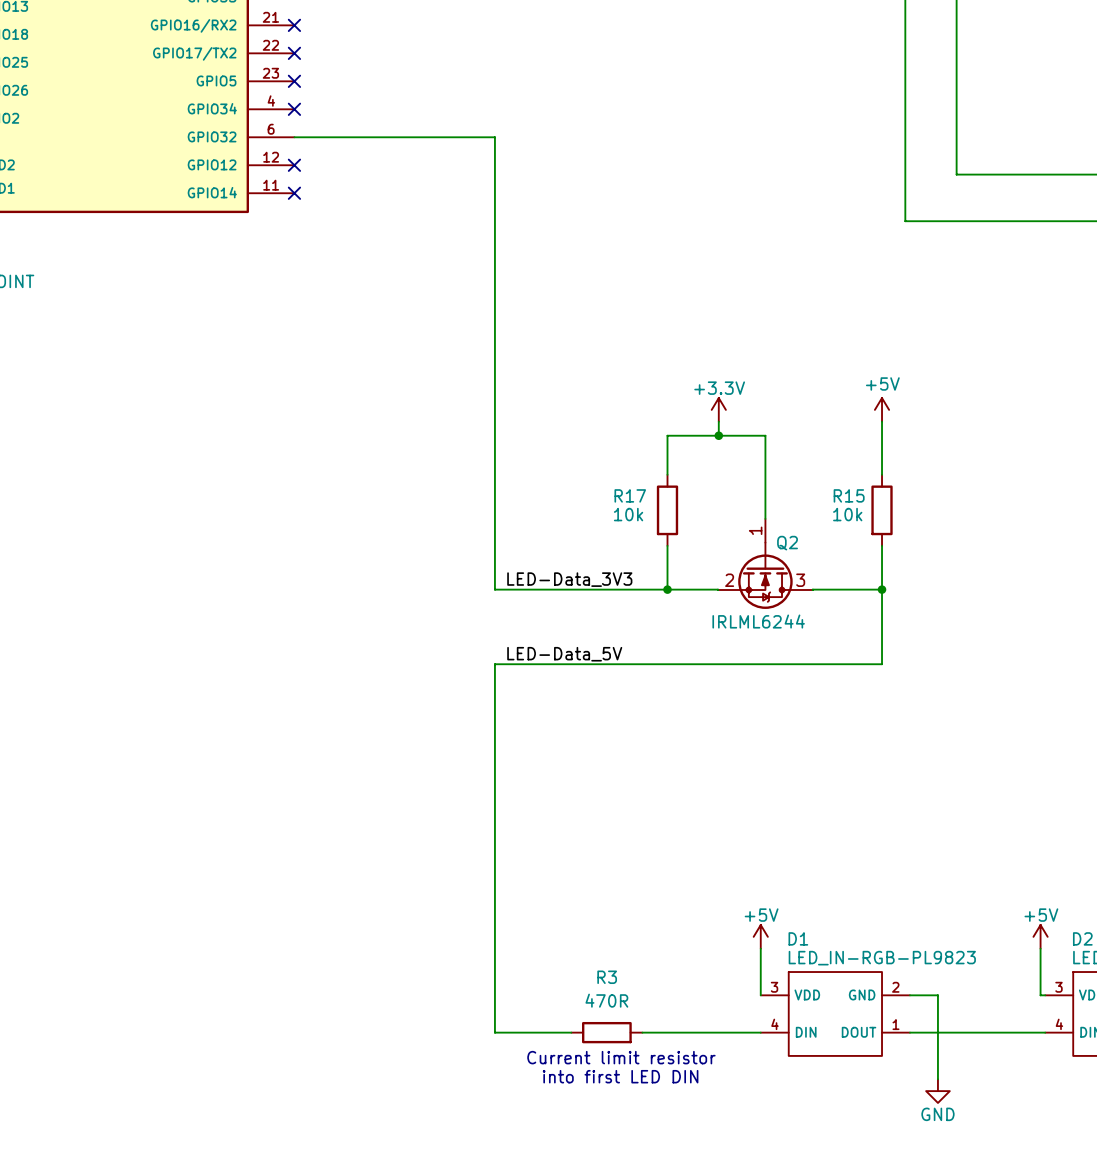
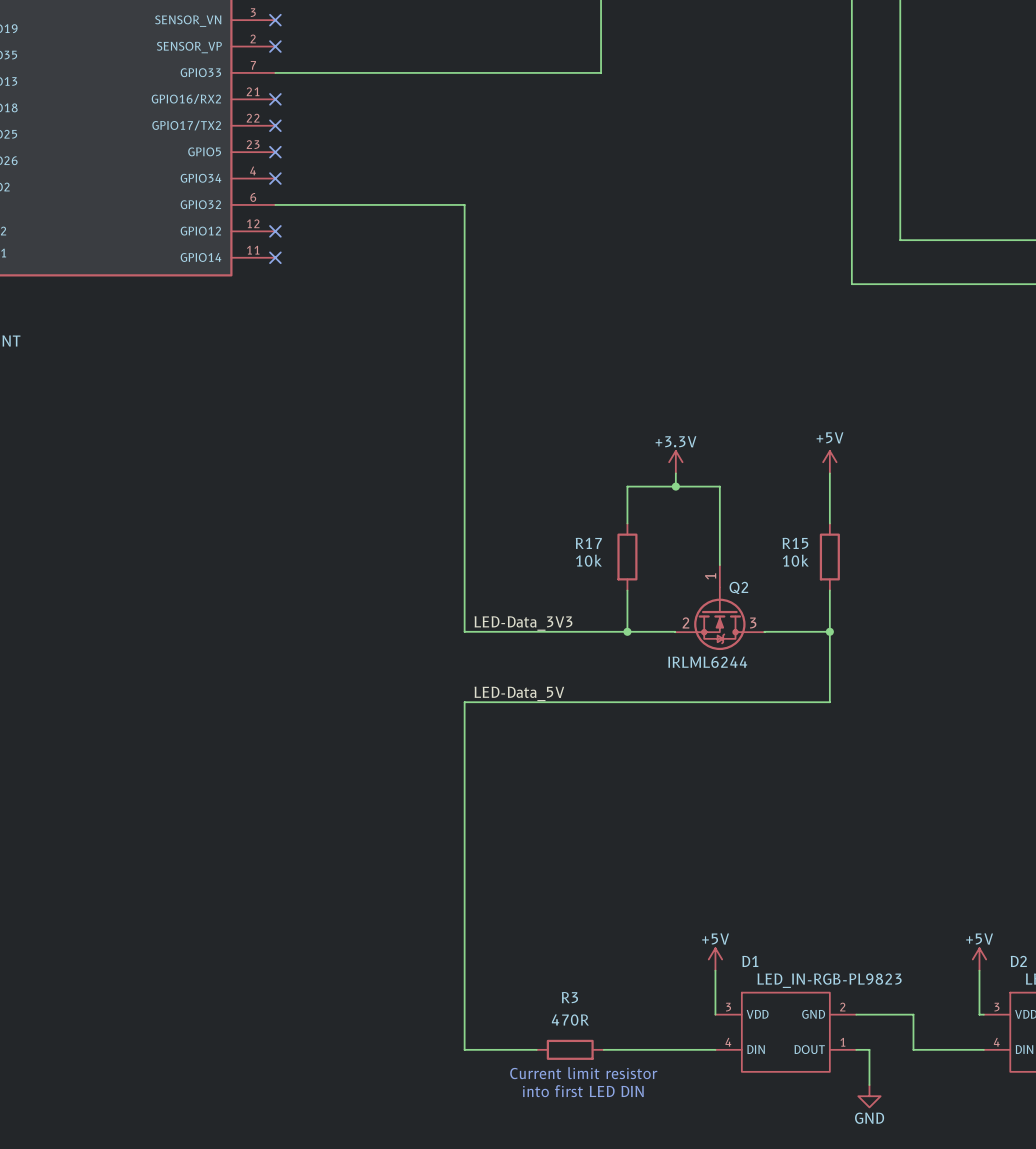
wire: (937, 995) (937, 1079) -> none
wire: (923, 1032) (970, 1032) -> (882, 1014) (913, 1014) (913, 1049)
wire: none -> (869, 1049) (869, 1085)
power symbol position: GND (937, 1091) -> GND (869, 1096)

